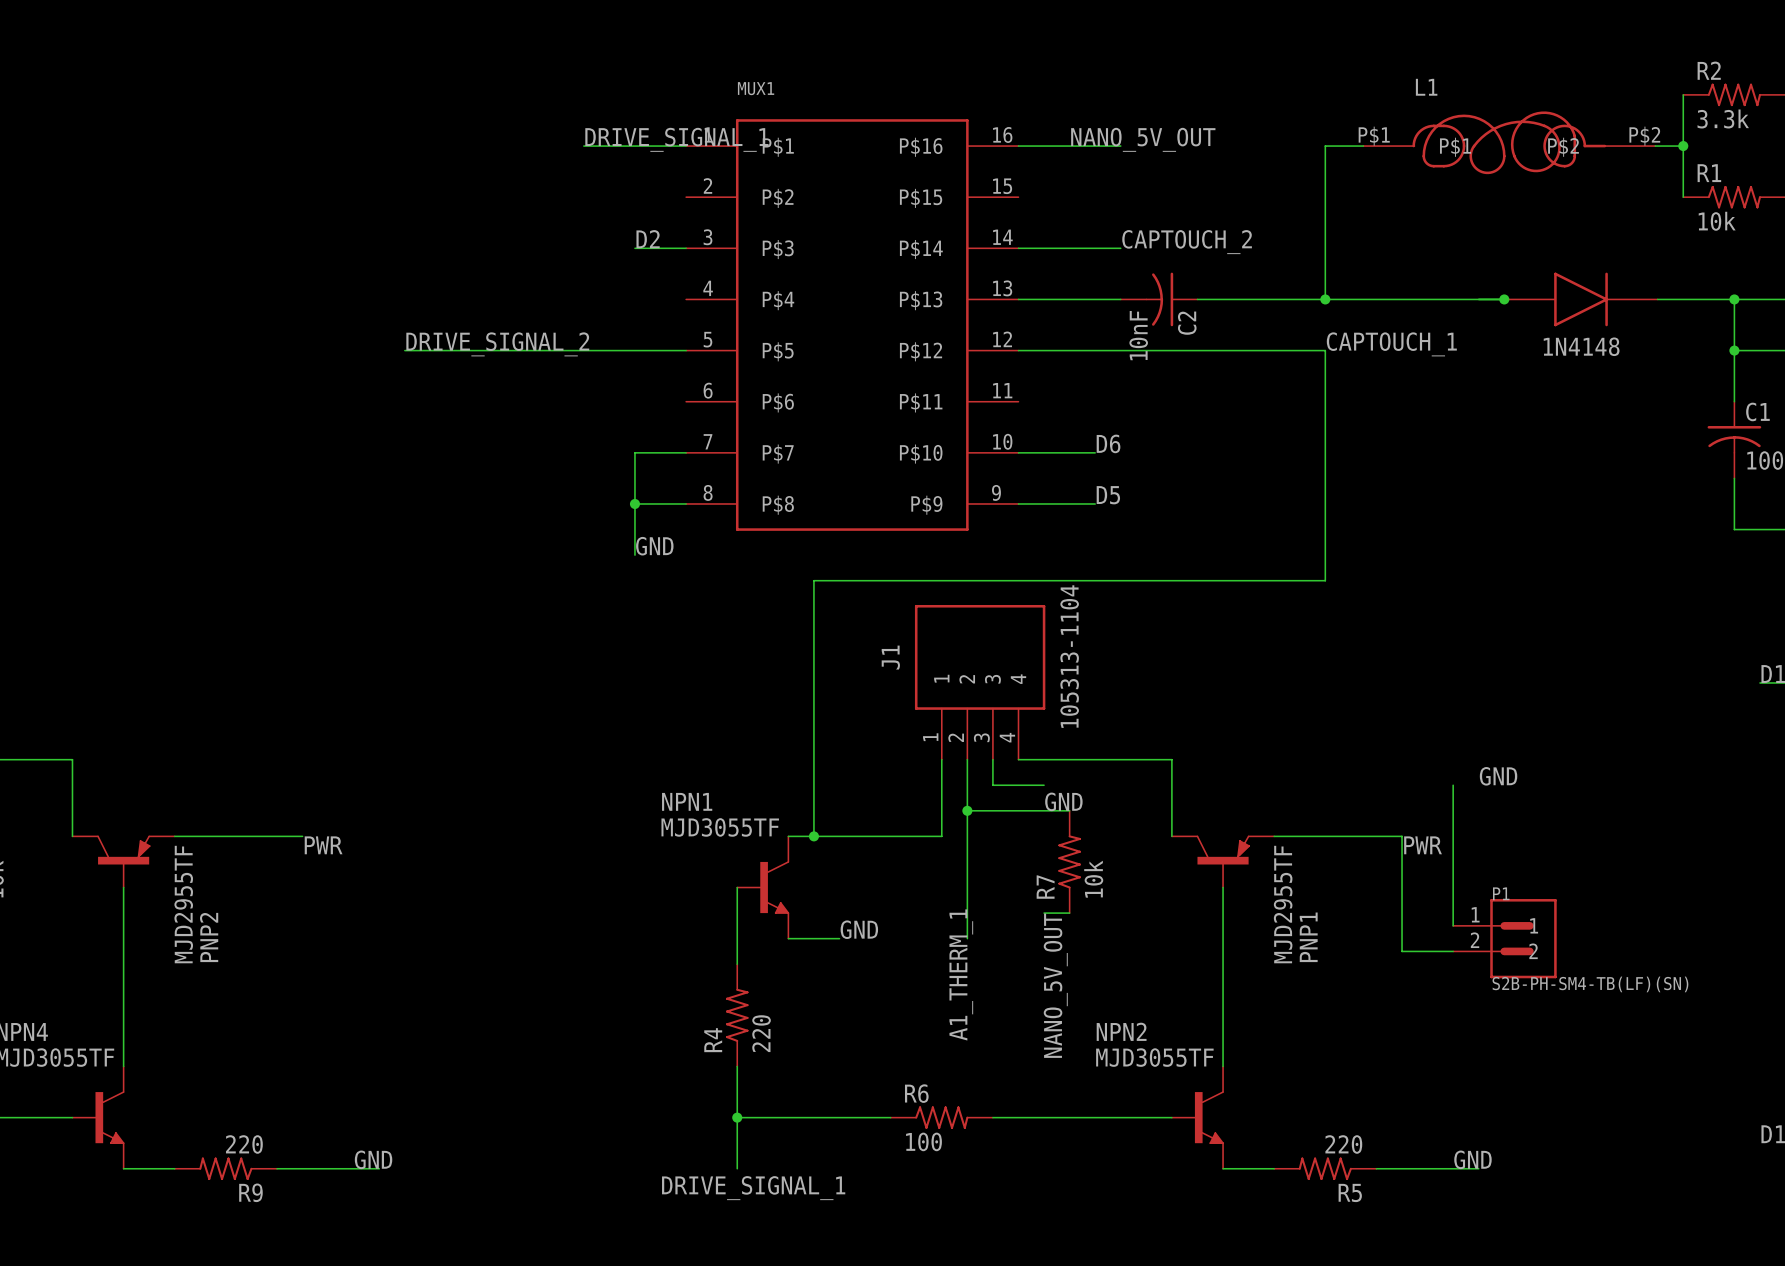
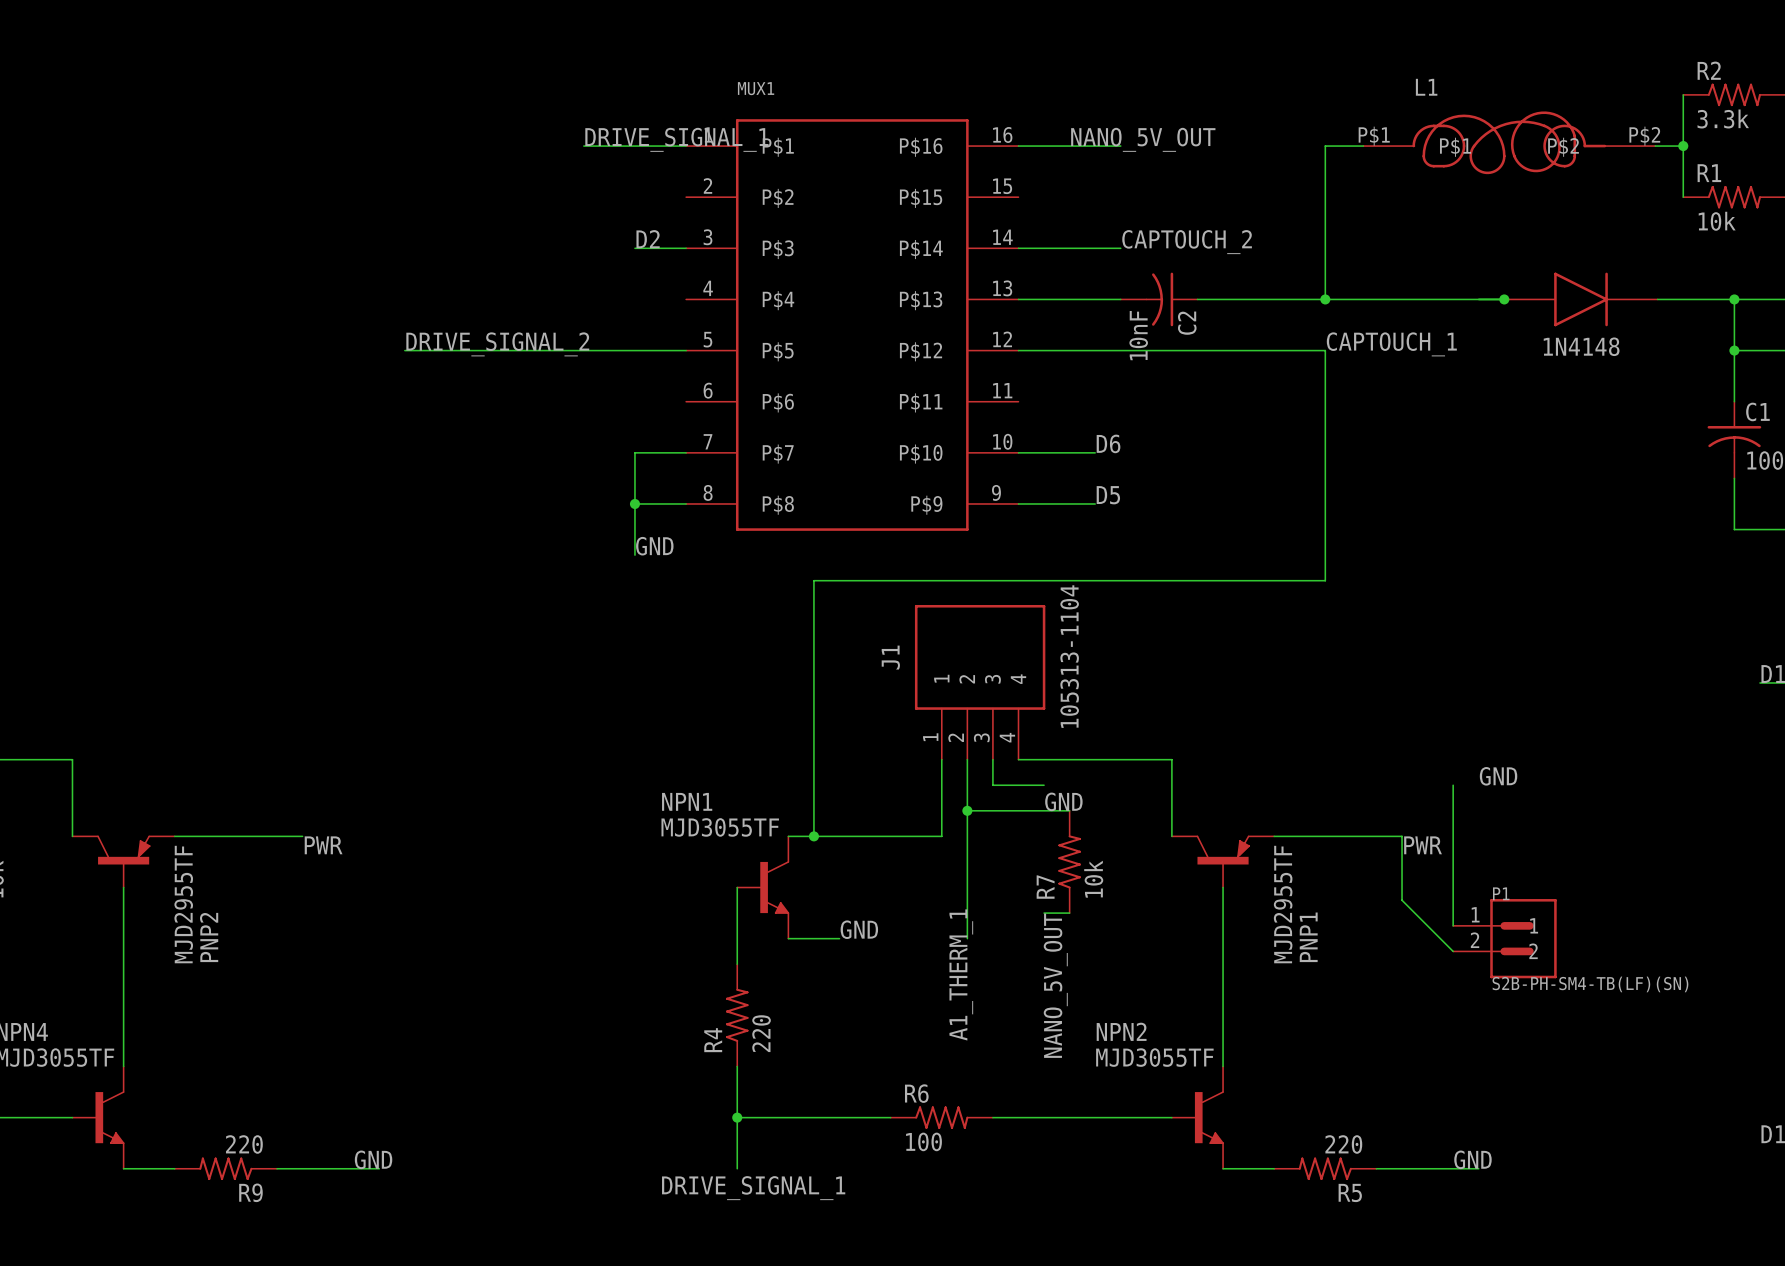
wire: (1402, 900) (1402, 951) (1453, 951) -> (1402, 900) (1453, 951)

